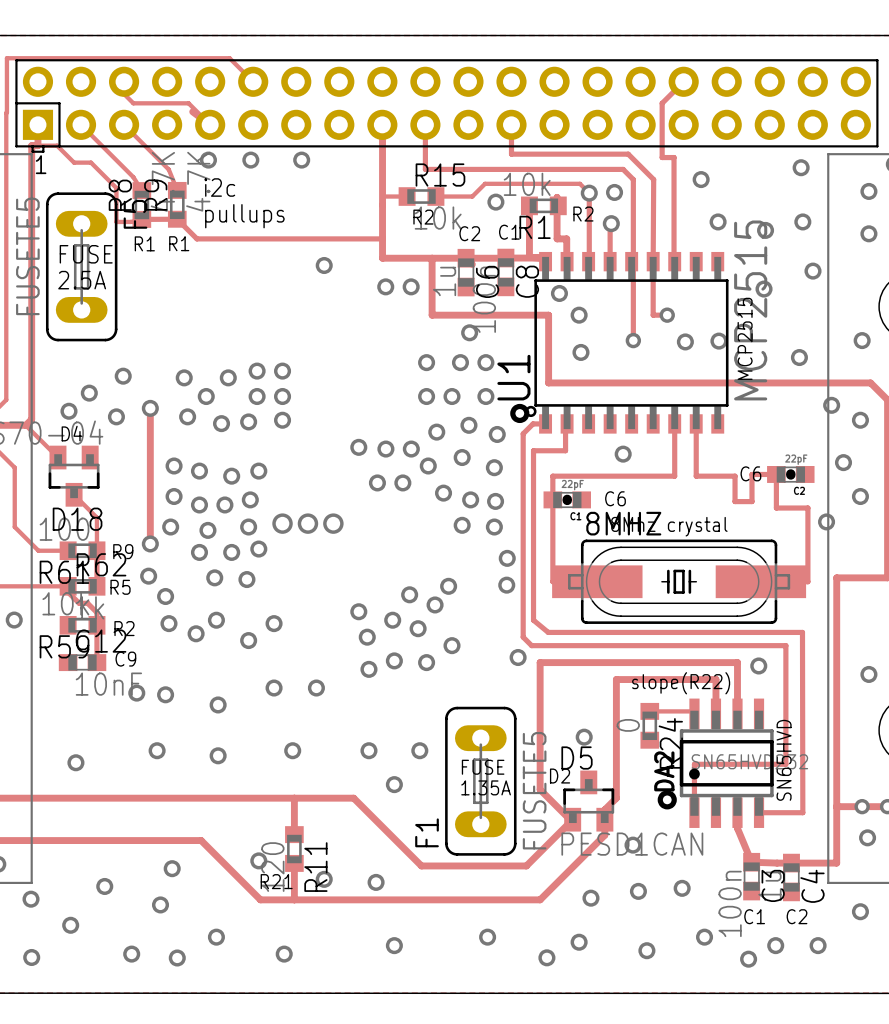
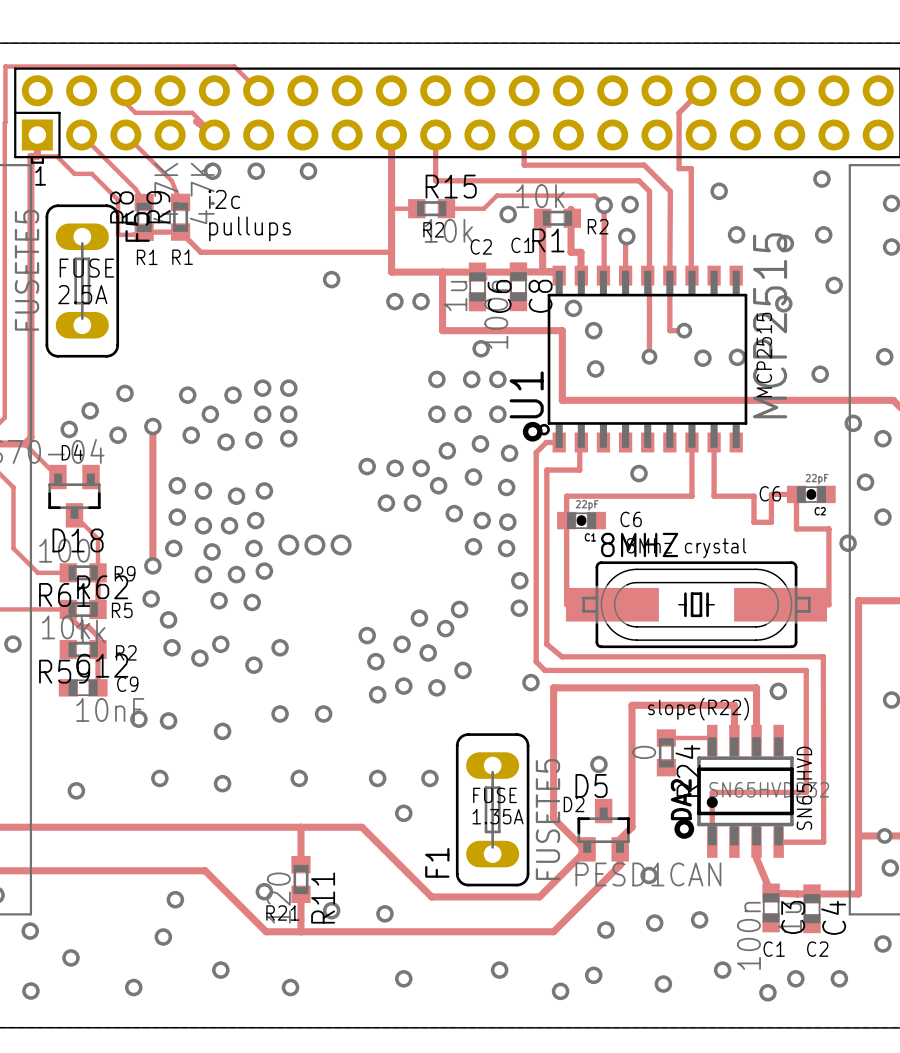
via: (104, 886) -> none
via: (177, 957) -> none

